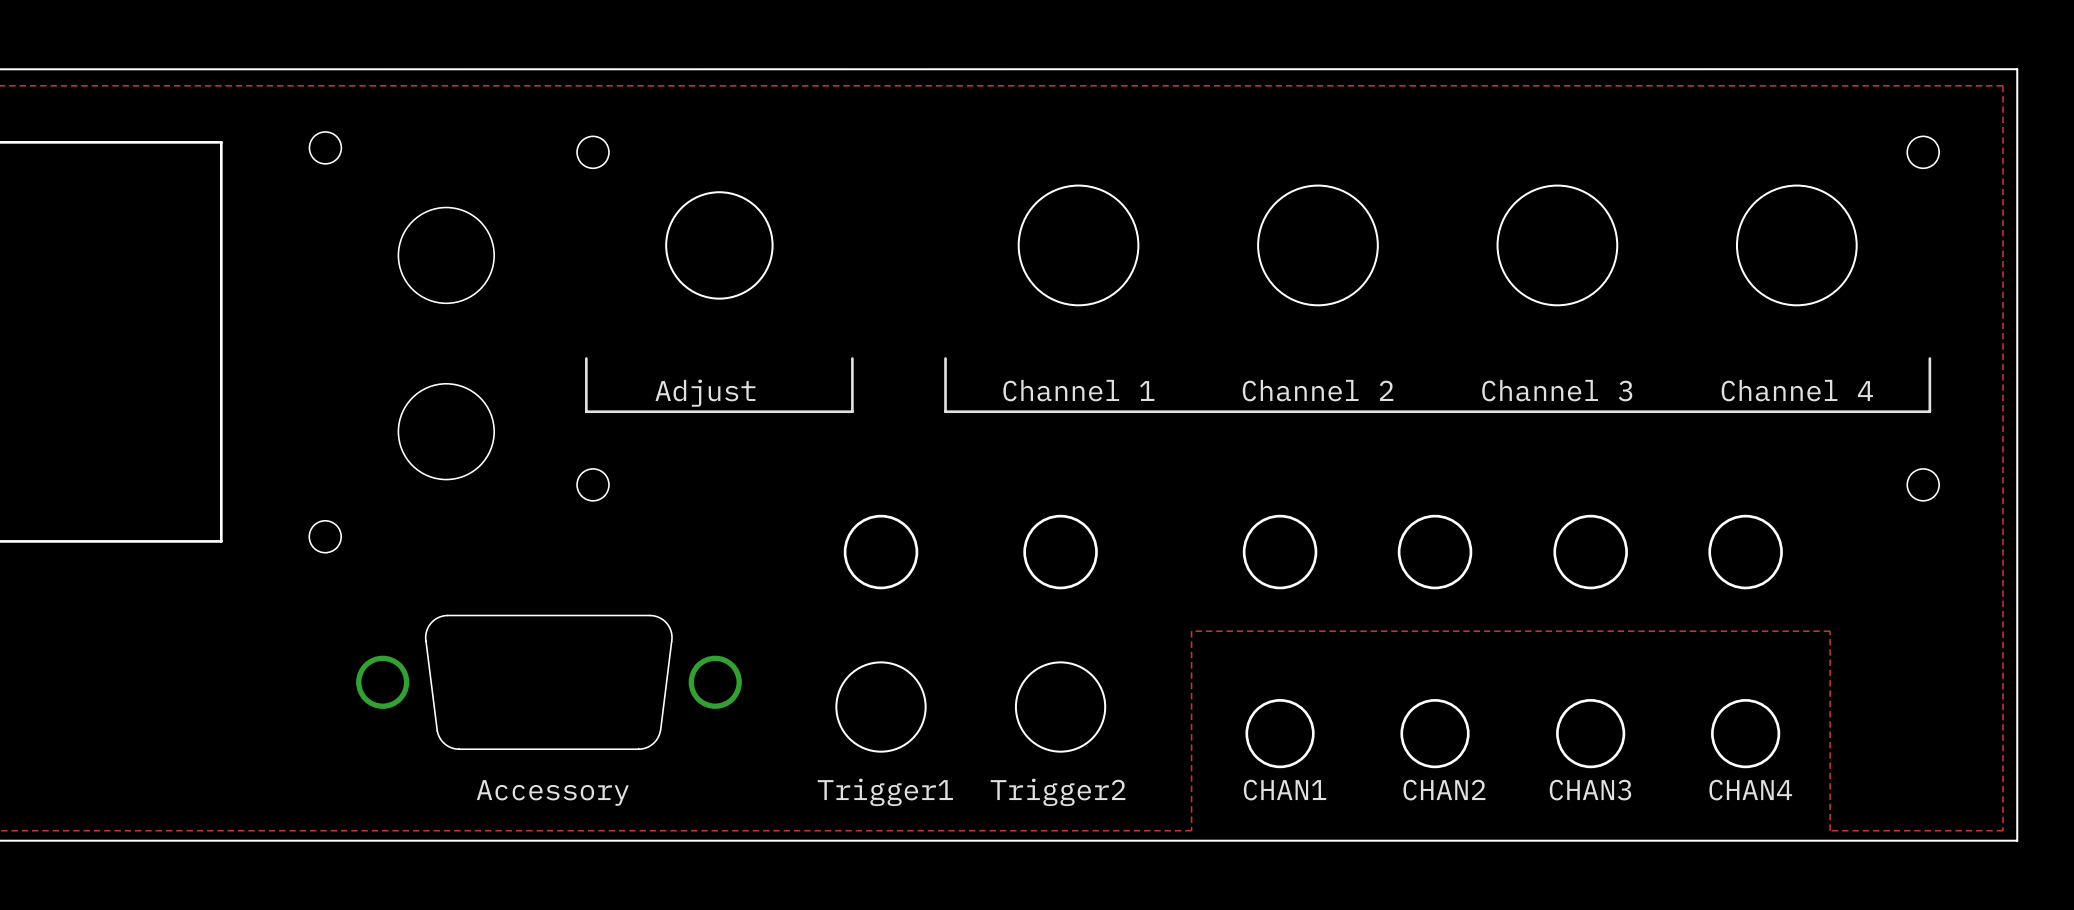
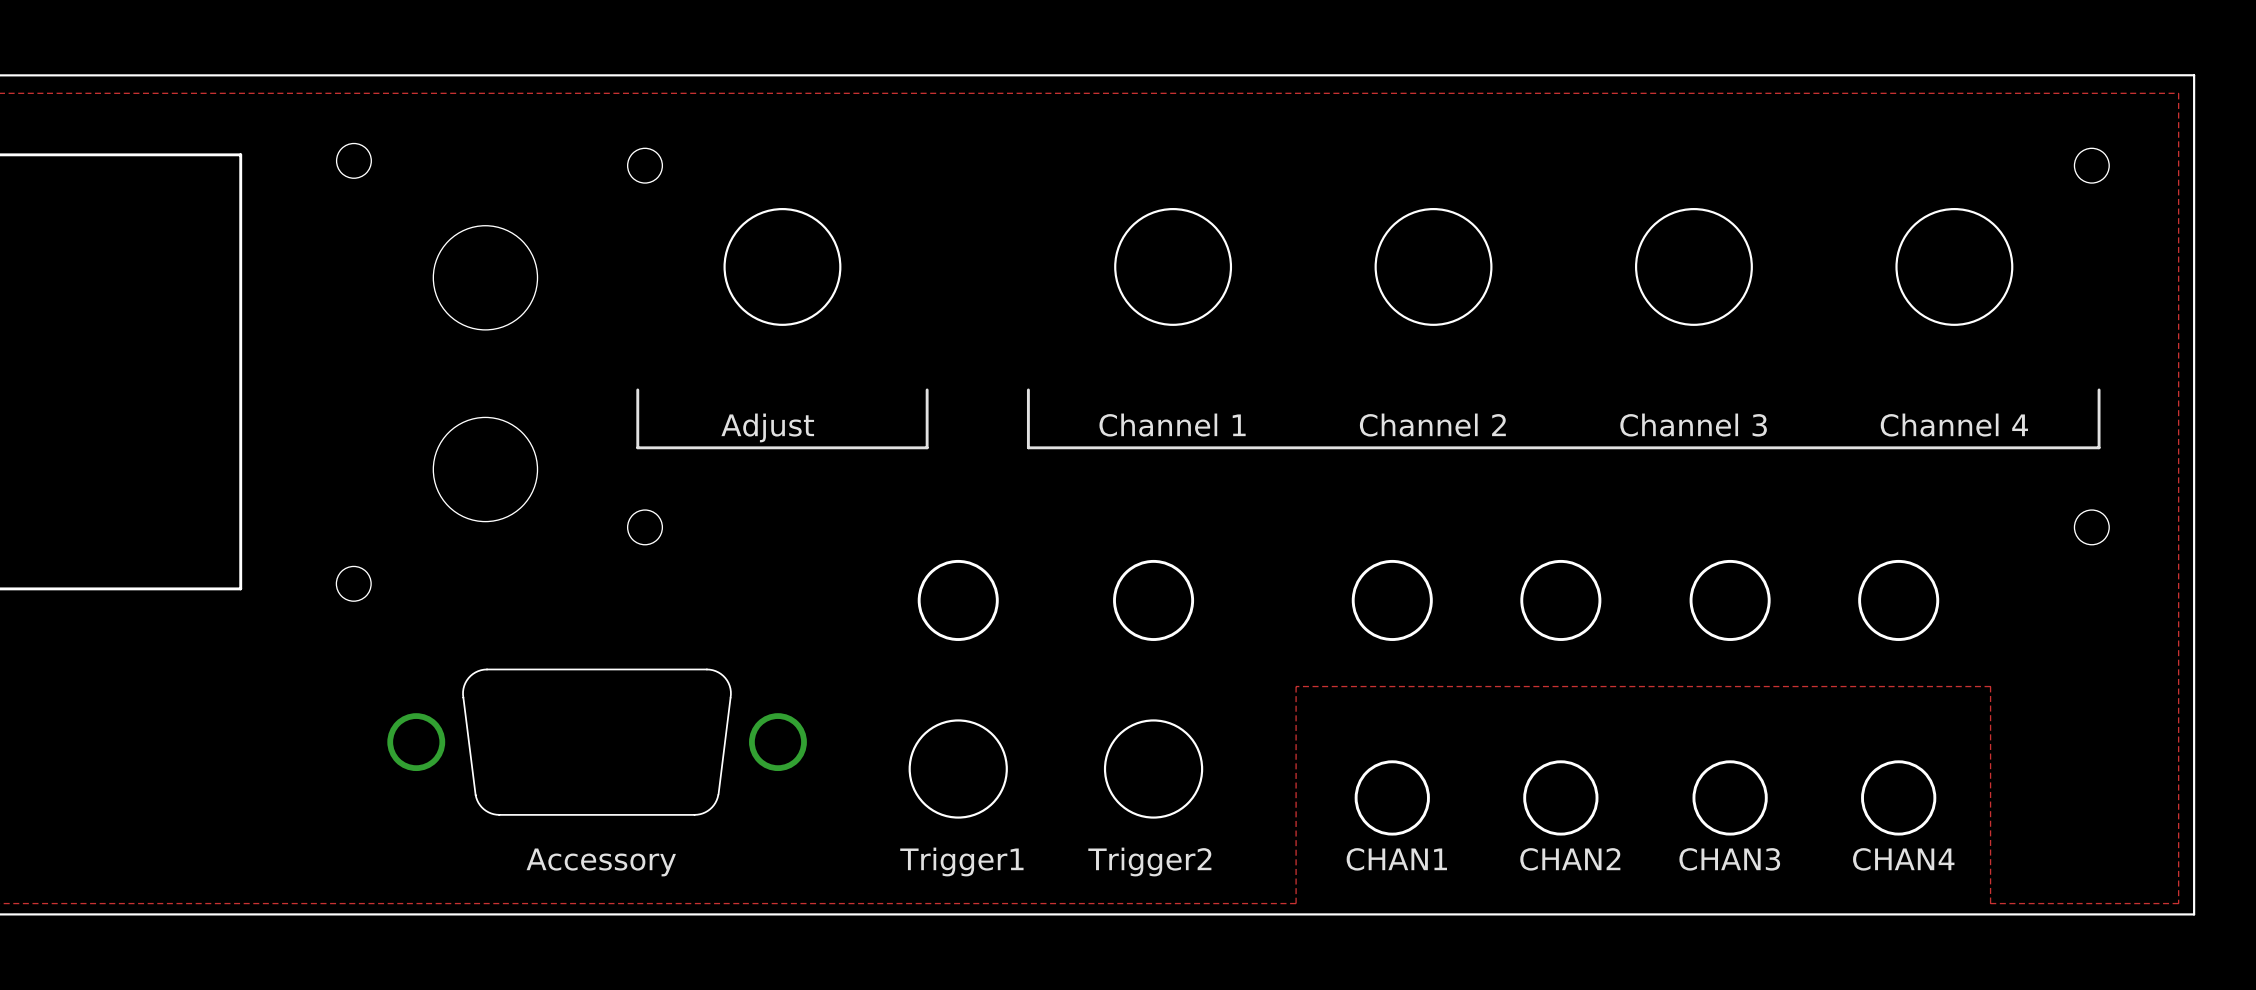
drawing shape: [1017, 184, 1140, 307] -> [1114, 208, 1233, 326]
drawing shape: [1257, 184, 1379, 307] -> [1374, 208, 1493, 326]
drawing shape: [1496, 184, 1619, 307] -> [1634, 208, 1753, 326]
drawing shape: [1735, 184, 1858, 307] -> [1895, 208, 2014, 326]

